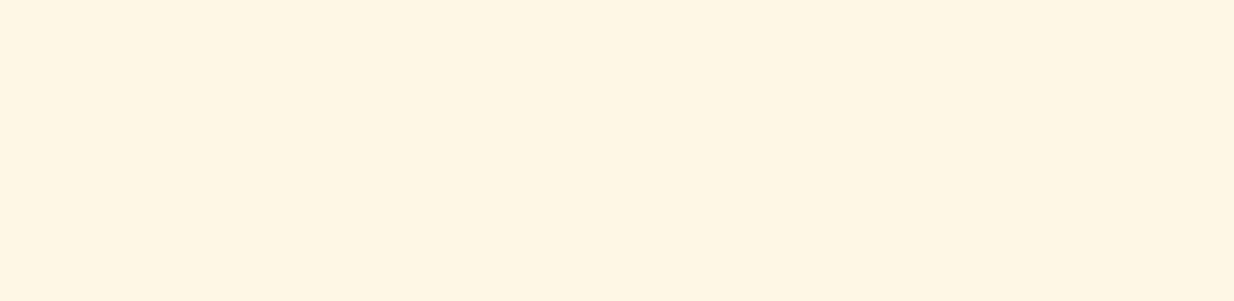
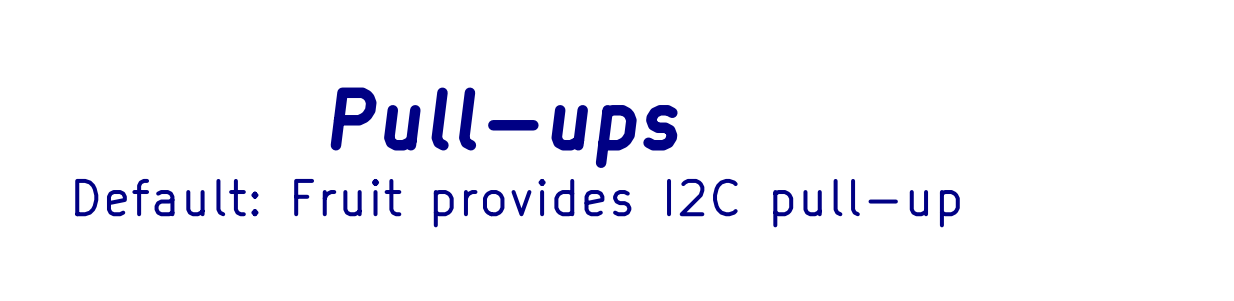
text: none -> Pull-ups (504, 127)
text: none -> Default: Fruit provides I2C pull-up (517, 203)

